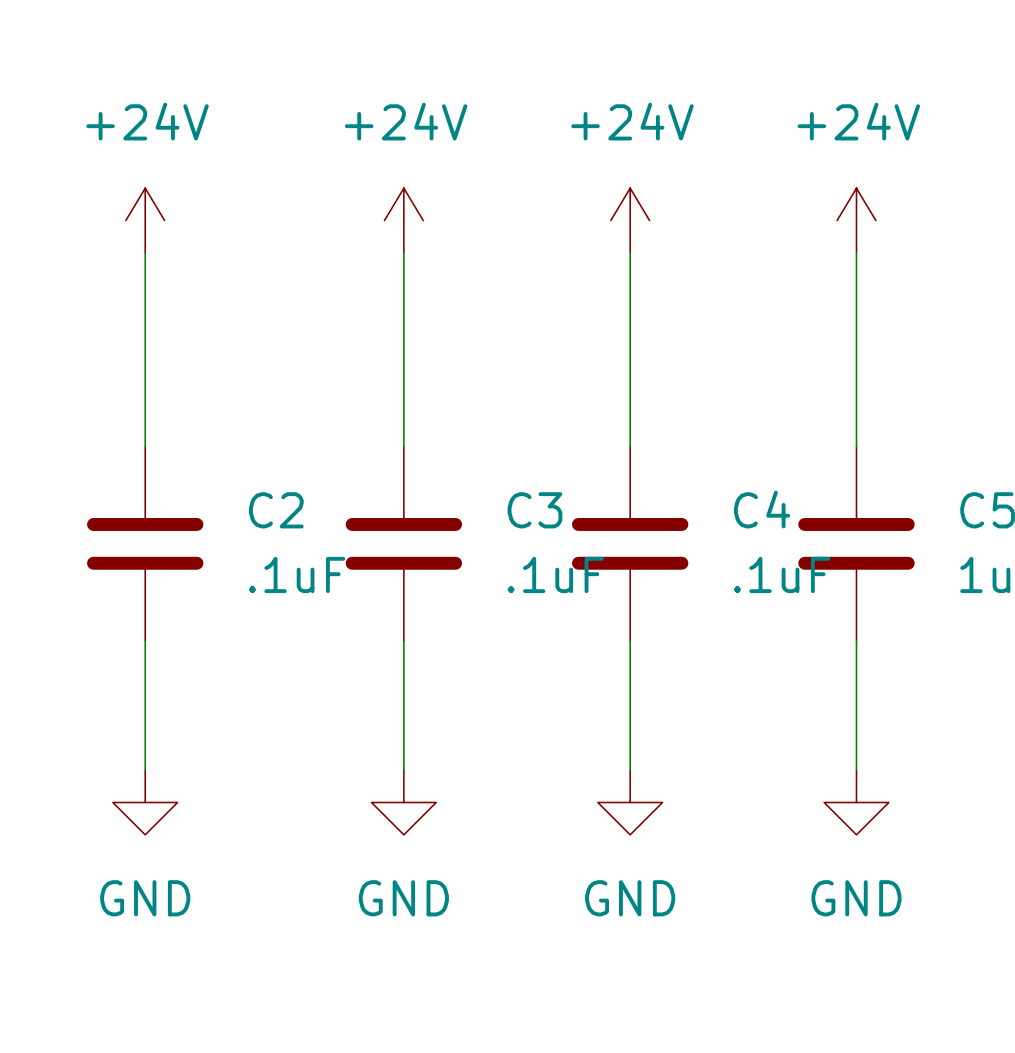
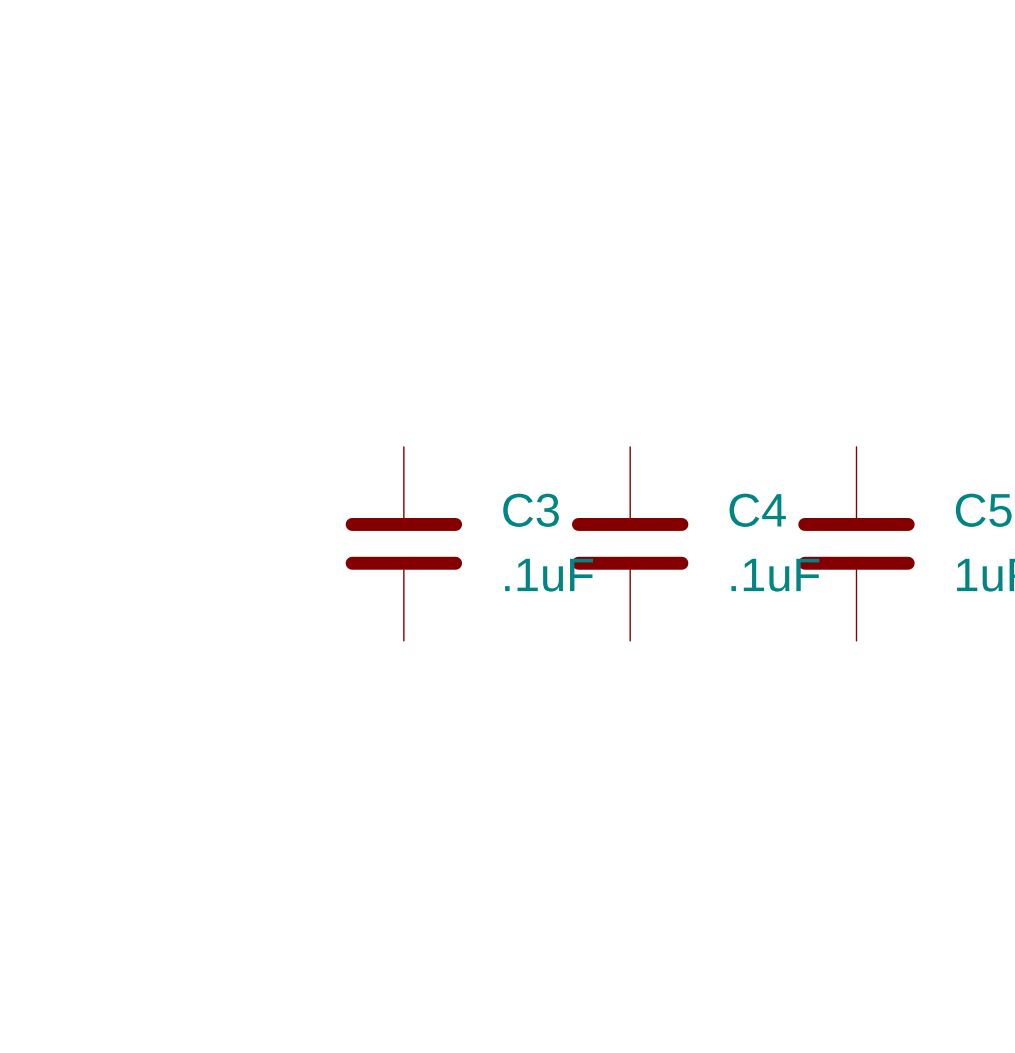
power symbol: +24V (145, 220) -> none
power symbol: +24V (403, 220) -> none
power symbol: +24V (630, 220) -> none
power symbol: +24V (856, 220) -> none
wire: (145, 252) (145, 446) -> none
wire: (403, 252) (403, 446) -> none
wire: (630, 252) (630, 446) -> none
wire: (856, 252) (856, 446) -> none
C2: .1uF (145, 543) -> none
wire: (145, 640) (145, 770) -> none
wire: (403, 640) (403, 770) -> none
wire: (630, 640) (630, 770) -> none
wire: (856, 640) (856, 770) -> none
power symbol: GND (145, 802) -> none
power symbol: GND (403, 802) -> none
power symbol: GND (630, 802) -> none
power symbol: GND (856, 802) -> none

